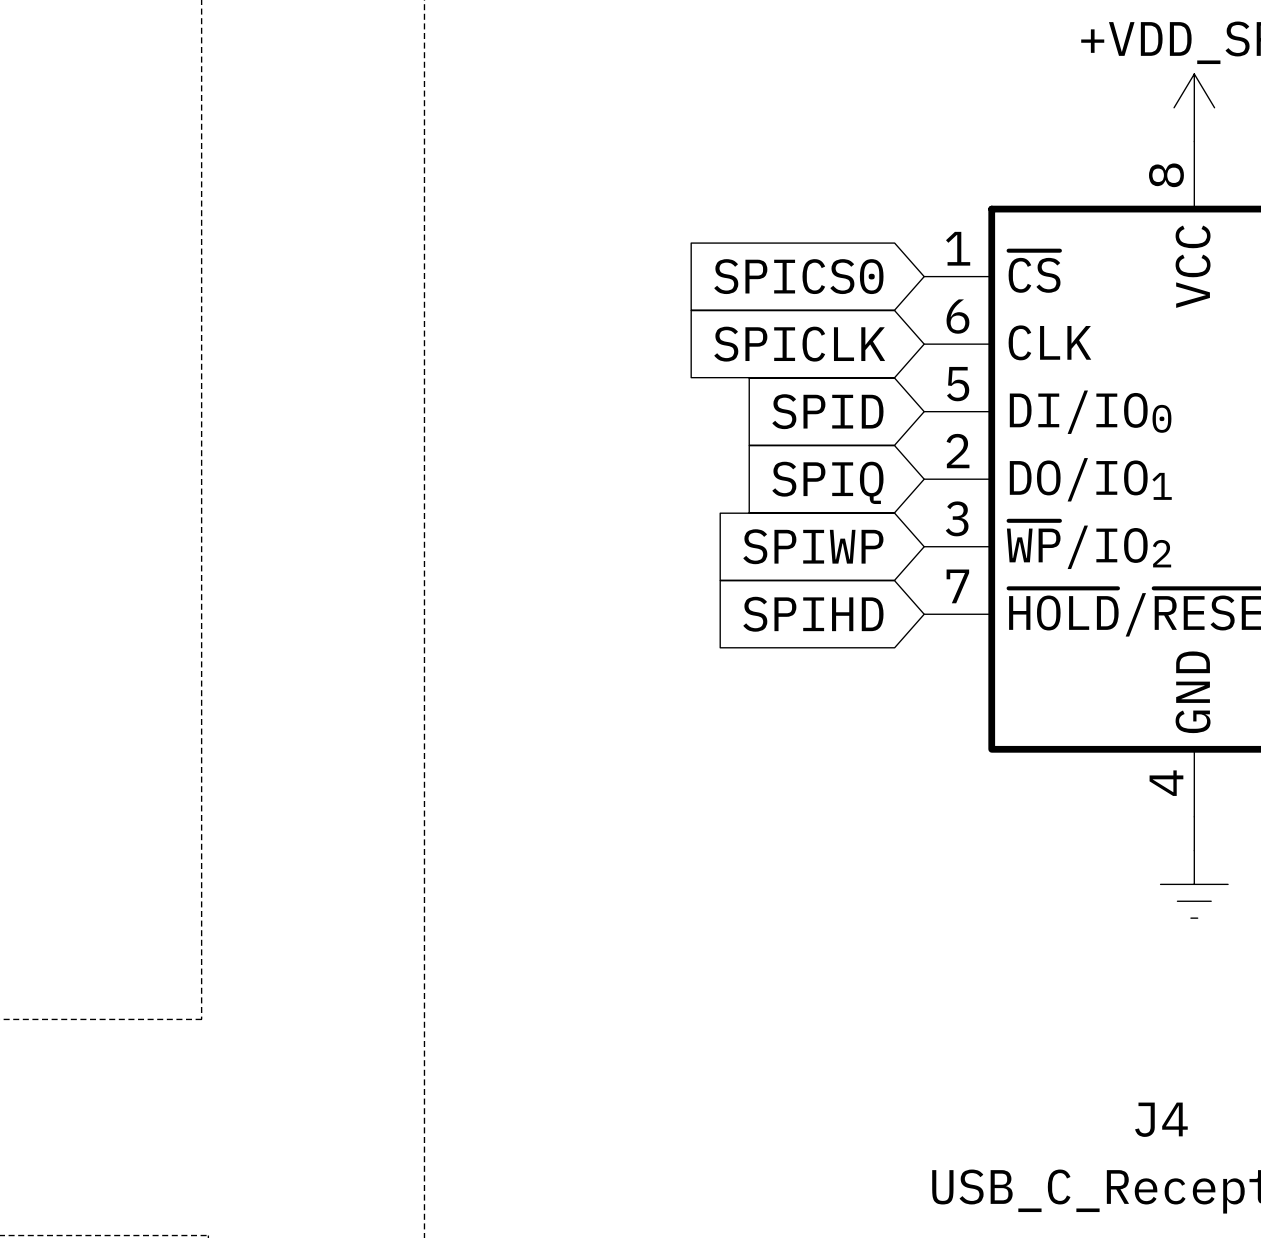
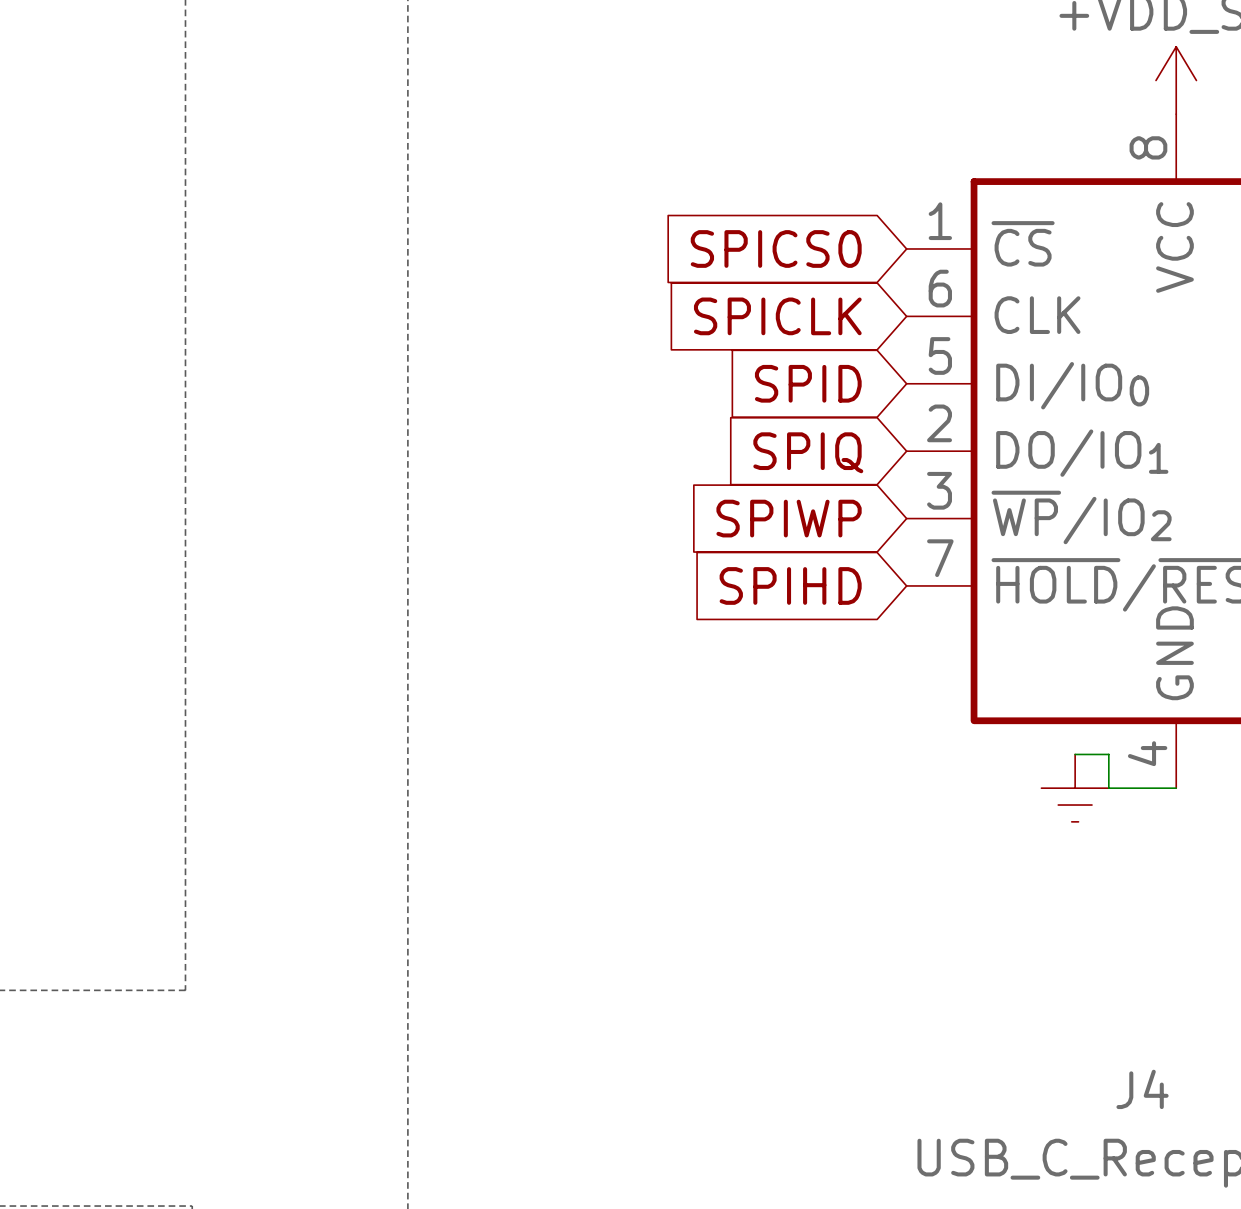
wire: (1194, 816) (1194, 850) -> (1176, 788) (1108, 788) (1108, 754) (1075, 754)
power symbol position: (1194, 884) -> (1075, 788)

